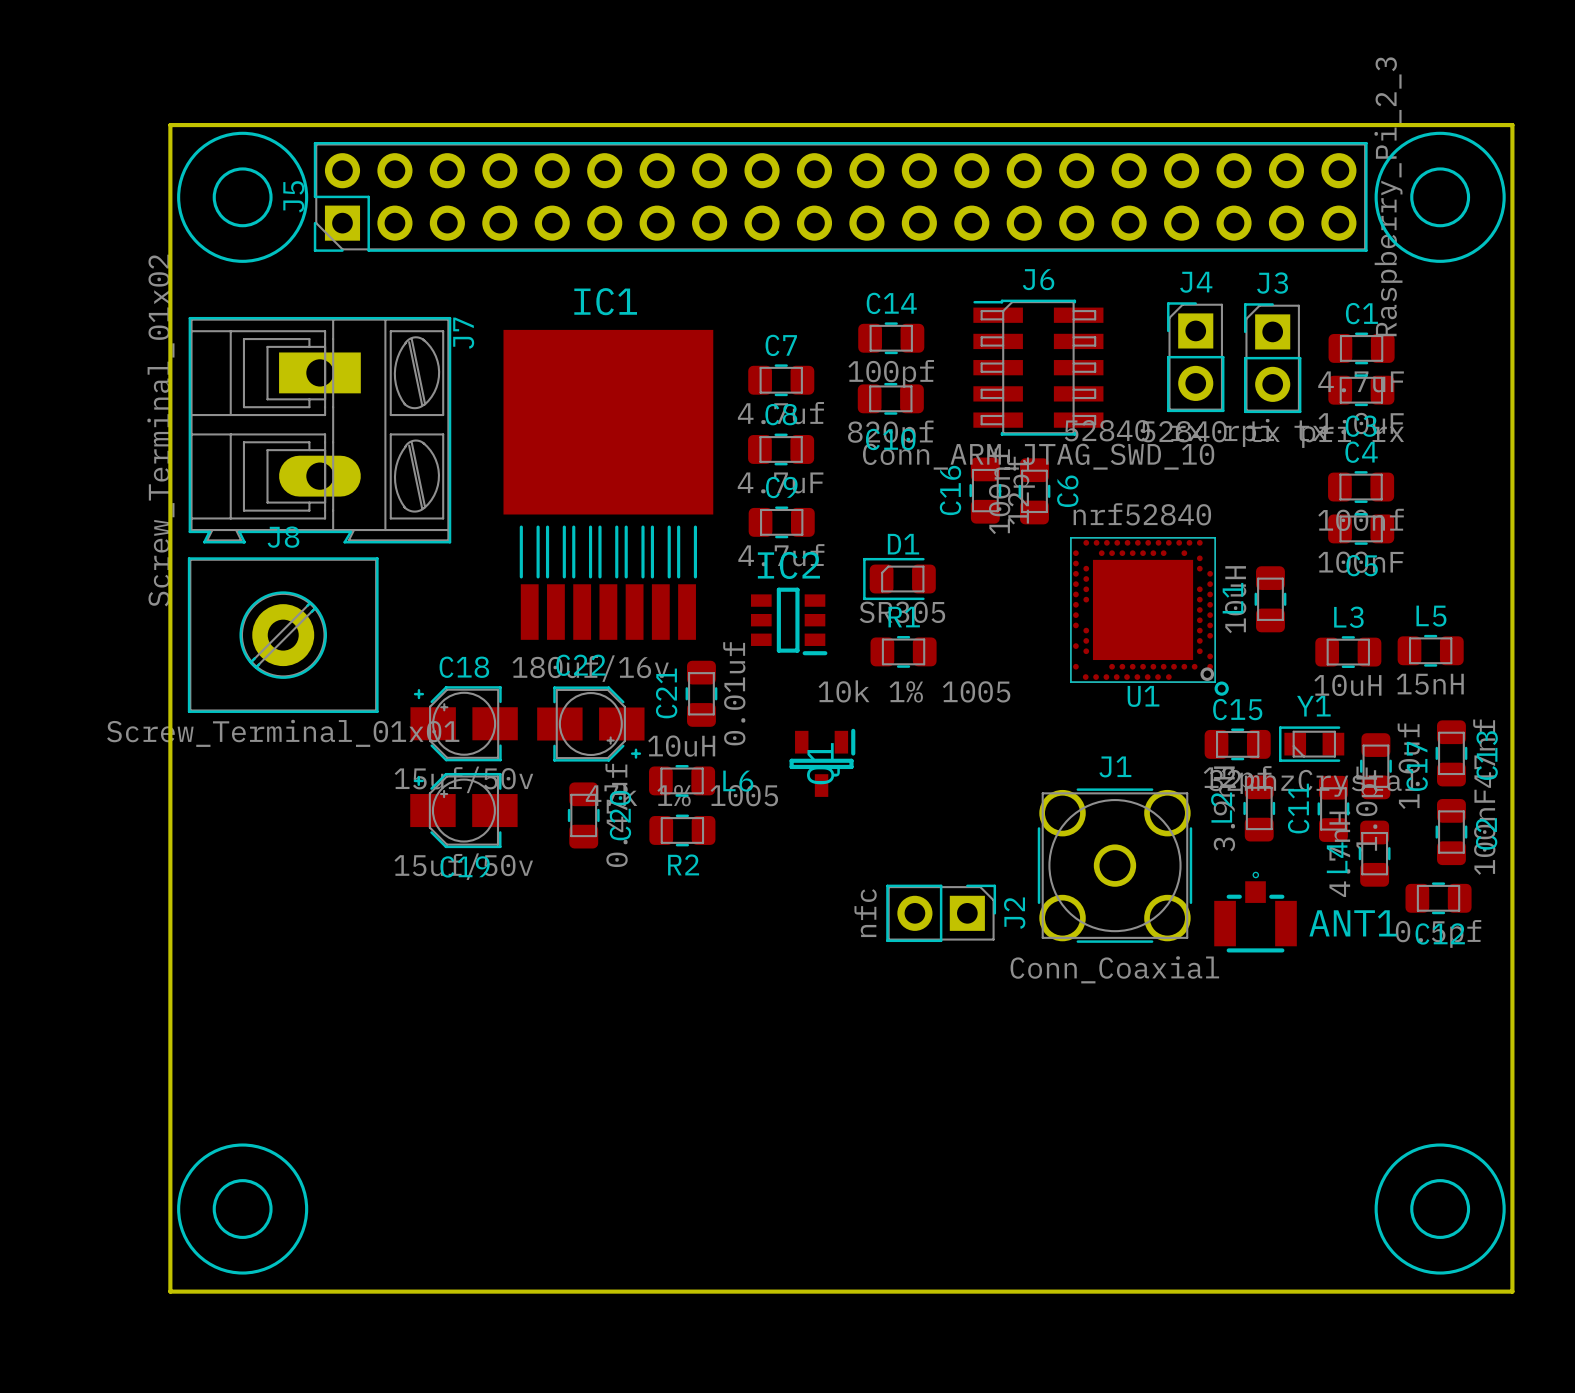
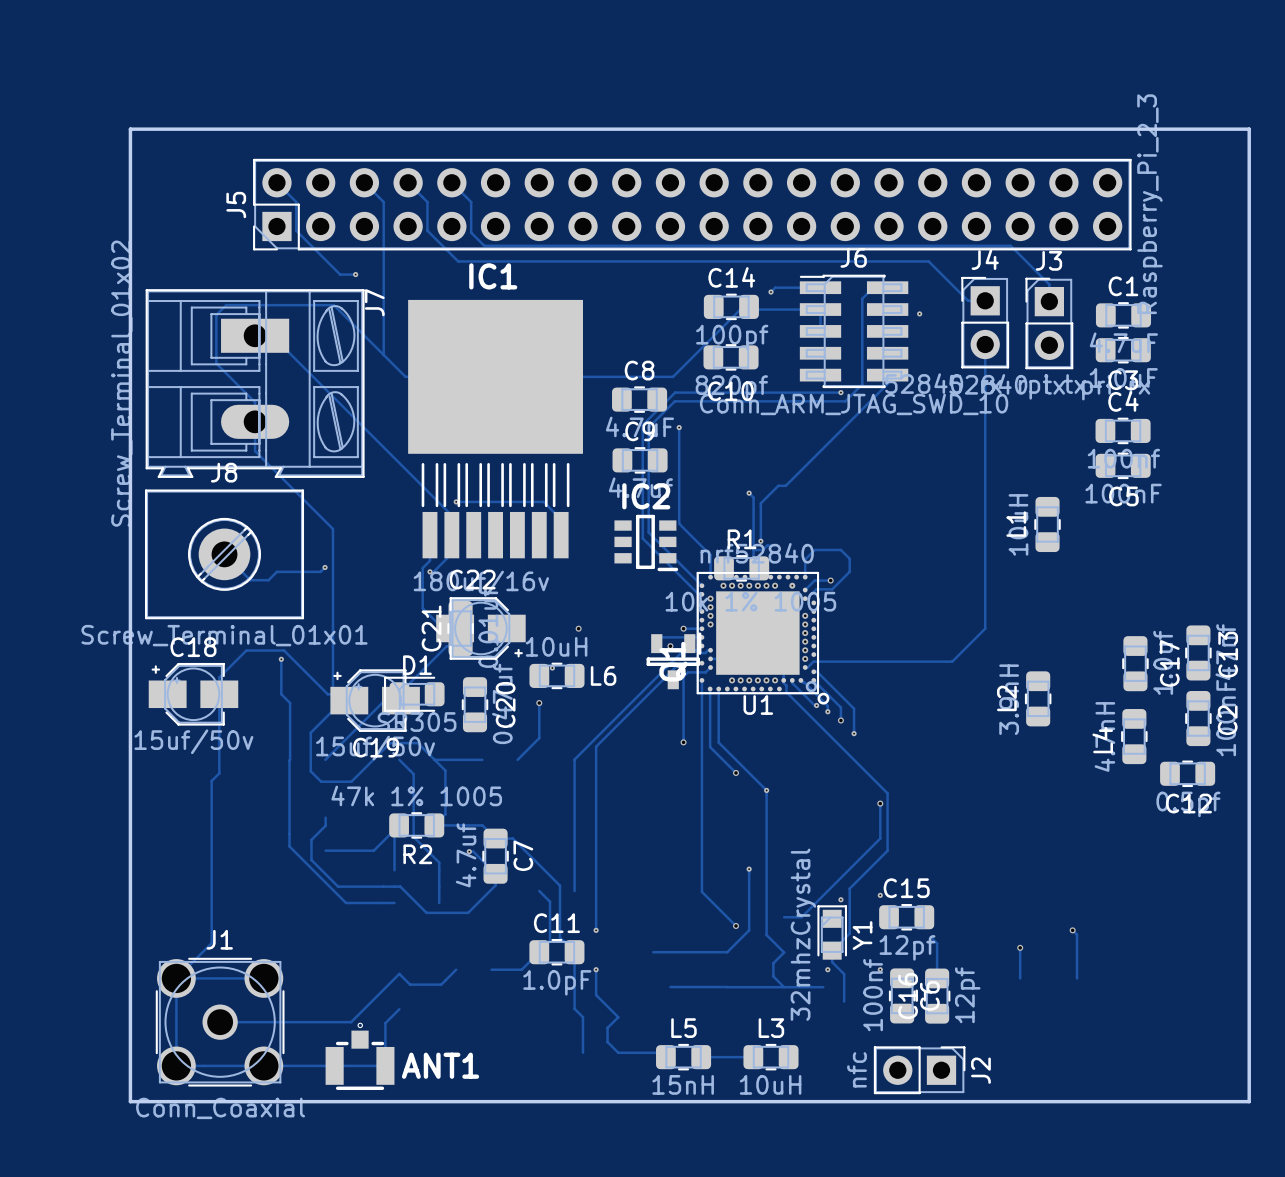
drawing: [177, 131, 309, 263] -> none
drawing: [1374, 131, 1506, 263] -> none
track: none -> (276, 182) (296, 202) (296, 230) (340, 274) (355, 274)
track: none -> (364, 182) (383, 202) (383, 354)
track: none -> (408, 182) (427, 202) (427, 230) (458, 261) (928, 261) (968, 300) (985, 300)
track: none -> (451, 182) (471, 202) (471, 232) (484, 245) (1010, 245) (1049, 284) (1049, 301)
J5 position: (840, 196) -> (692, 204)
via: none -> (355, 274)
track: none -> (820, 287) (775, 287) (770, 292)
track: none -> (887, 287) (873, 287) (862, 298) (862, 384) (845, 401) (674, 401) (648, 427) (648, 532) (701, 585)
via: none -> (770, 292)
via: none -> (919, 313)
track: none -> (820, 331) (820, 309) (740, 309) (673, 376) (405, 376) (333, 305) (226, 305) (216, 314) (216, 363) (255, 402) (255, 451) (332, 528) (332, 710) (310, 732) (310, 771) (321, 781) (351, 781) (390, 743) (417, 743) (445, 770) (445, 814) (434, 825) (482, 825) (495, 838) (512, 838) (559, 885) (559, 937) (574, 952) (574, 1008) (583, 1017) (583, 1052)
track: none -> (255, 335) (272, 335) (451, 515) (451, 553) (433, 571) (429, 571)
C7 rotation: 0° (781, 380) -> 90° clockwise (495, 856)
C7 position: (781, 380) -> (495, 856)
track: none -> (985, 344) (985, 628) (952, 661) (813, 661) (805, 667)
track: none -> (887, 375) (887, 383) (785, 485) (778, 485) (760, 503) (760, 541)
track: none -> (840, 392) (675, 392) (642, 424) (642, 538) (698, 594) (701, 594)
via: none -> (840, 392)
track: none -> (679, 427) (679, 523) (710, 555) (710, 577)
via: none -> (679, 427)
C16 position: (985, 490) -> (937, 996)
C6 position: (1034, 491) -> (902, 995)
track: none -> (749, 493) (753, 497) (753, 577)
via: none -> (749, 493)
track: none -> (456, 501) (543, 501) (561, 519) (561, 535)
via: none -> (456, 501)
D1 position: (899, 579) -> (414, 694)
track: none -> (429, 535) (429, 560) (422, 568) (422, 608) (460, 646) (446, 646) (399, 694) (390, 694) (325, 759)
U1 position: (1149, 616) -> (763, 638)
via: none -> (760, 541)
track: none -> (770, 545) (767, 545) (762, 550) (753, 550)
track: none -> (224, 554) (250, 580) (268, 580) (276, 571) (320, 571) (325, 567)
via: none -> (325, 567)
L5 position: (1430, 650) -> (683, 1057)
L3 position: (1348, 652) -> (770, 1057)
via: none -> (429, 571)
track: none -> (805, 577) (805, 559) (814, 550) (840, 550) (849, 558) (849, 571) (832, 589) (816, 589) (805, 598)
track: none -> (830, 580) (814, 580) (805, 590)
via: none -> (830, 580)
via: none -> (723, 585)
via: none -> (732, 585)
via: none -> (740, 585)
via: none -> (749, 585)
via: none -> (757, 585)
via: none -> (766, 585)
via: none -> (775, 585)
via: none -> (792, 585)
via: none -> (710, 598)
C21 position: (701, 693) -> (460, 628)
via: none -> (710, 607)
via: none -> (710, 615)
via: none -> (805, 615)
via: none -> (710, 624)
via: none -> (805, 624)
C18 position: (464, 723) -> (193, 694)
via: none -> (578, 628)
track: none -> (683, 628) (701, 628)
via: none -> (683, 628)
via: none -> (805, 633)
track: none -> (657, 637) (701, 637)
via: none -> (805, 641)
C15 position: (1237, 744) -> (906, 917)
Y1 rotation: 0° (1311, 744) -> 90° clockwise (832, 932)
Y1 position: (1311, 744) -> (832, 932)
via: none -> (670, 646)
track: none -> (710, 650) (705, 653) (698, 653) (695, 650) (683, 650) (574, 759) (574, 891)
via: none -> (805, 650)
track: none -> (281, 659) (281, 694) (290, 703) (289, 846) (346, 902) (394, 902)
via: none -> (281, 659)
track: none -> (710, 658) (732, 658) (757, 633) (783, 658) (783, 682) (786, 685) (786, 692) (887, 793) (887, 850) (849, 888) (849, 933) (832, 950) (832, 962) (844, 974) (844, 1001)
via: none -> (805, 658)
track: none -> (701, 663) (679, 663) (596, 746) (596, 930)
track: none -> (710, 667) (705, 672) (687, 672) (683, 676) (683, 742)
via: none -> (552, 668)
track: none -> (813, 671) (817, 671) (854, 708) (854, 733)
track: none -> (701, 680) (701, 891) (736, 925)
via: none -> (732, 680)
via: none -> (740, 680)
via: none -> (749, 680)
via: none -> (757, 680)
via: none -> (766, 680)
via: none -> (775, 680)
track: none -> (792, 680) (792, 683) (816, 705)
track: none -> (800, 680) (827, 705) (827, 711)
track: none -> (813, 680) (840, 707) (840, 720)
track: none -> (710, 689) (710, 747) (736, 772)
track: none -> (718, 689) (718, 742) (766, 790) (766, 935) (784, 952) (773, 963) (773, 976) (784, 987)
track: none -> (332, 694) (327, 694) (284, 650) (246, 650) (219, 677) (219, 773) (211, 780) (211, 943) (176, 978)
C11 rotation: 0° (1333, 808) -> 90° clockwise (556, 952)
C11 position: (1333, 808) -> (556, 952)
track: none -> (539, 703) (539, 738) (517, 759)
via: none -> (539, 703)
via: none -> (816, 705)
via: none -> (827, 711)
R2 position: (682, 830) -> (416, 825)
via: none -> (840, 720)
via: none -> (854, 733)
via: none -> (683, 742)
J1 position: (1114, 865) -> (220, 1022)
track: none -> (399, 759) (413, 774) (413, 837) (439, 862) (439, 902)
track: none -> (434, 759) (482, 759)
via: none -> (736, 772)
ANT1 position: (1255, 912) -> (360, 1056)
J2 position: (941, 913) -> (919, 1070)
via: none -> (766, 790)
track: none -> (880, 803) (880, 838) (801, 917) (784, 917)
via: none -> (880, 803)
track: none -> (325, 817) (325, 825) (311, 839) (311, 860) (338, 886) (400, 886) (426, 912) (468, 912) (495, 885) (495, 873) (473, 851) (469, 851)
track: none -> (399, 825) (373, 850) (325, 850)
track: none -> (394, 830) (394, 870)
via: none -> (469, 851)
track: none -> (749, 869) (749, 930) (727, 952) (653, 952)
via: none -> (749, 869)
track: none -> (539, 891) (550, 901) (550, 941) (521, 969) (491, 969)
via: none -> (880, 895)
via: none -> (840, 899)
via: none -> (736, 925)
via: none -> (596, 930)
track: none -> (1072, 930) (1077, 934) (1077, 978)
via: none -> (1072, 930)
track: none -> (932, 939) (937, 943) (937, 978)
track: none -> (1020, 947) (1020, 978)
via: none -> (1020, 947)
track: none -> (456, 969) (441, 984) (410, 984) (399, 973) (351, 1022) (220, 1022)
track: none -> (596, 969) (596, 995) (618, 1017) (607, 1027) (607, 1042) (618, 1052) (661, 1052) (665, 1057)
via: none -> (596, 969)
via: none -> (827, 969)
via: none -> (880, 969)
drawing: [177, 1143, 309, 1275] -> none
track: none -> (176, 978) (263, 978)
track: none -> (176, 978) (176, 1065) (385, 1065) (385, 1023) (399, 1009)
drawing: [1374, 1143, 1506, 1275] -> none
track: none -> (670, 987) (727, 987)
track: none -> (727, 987) (823, 987)
track: none -> (701, 1057) (753, 1057)

